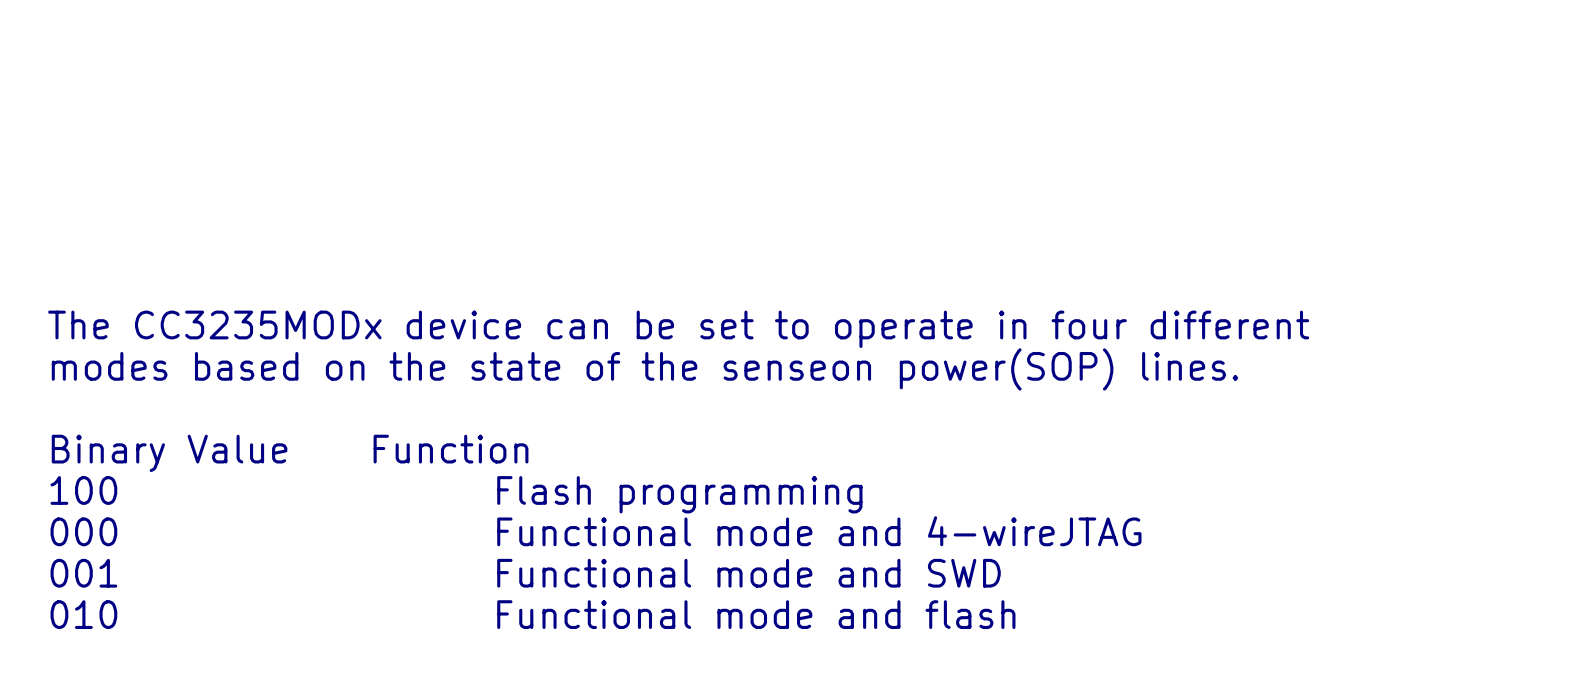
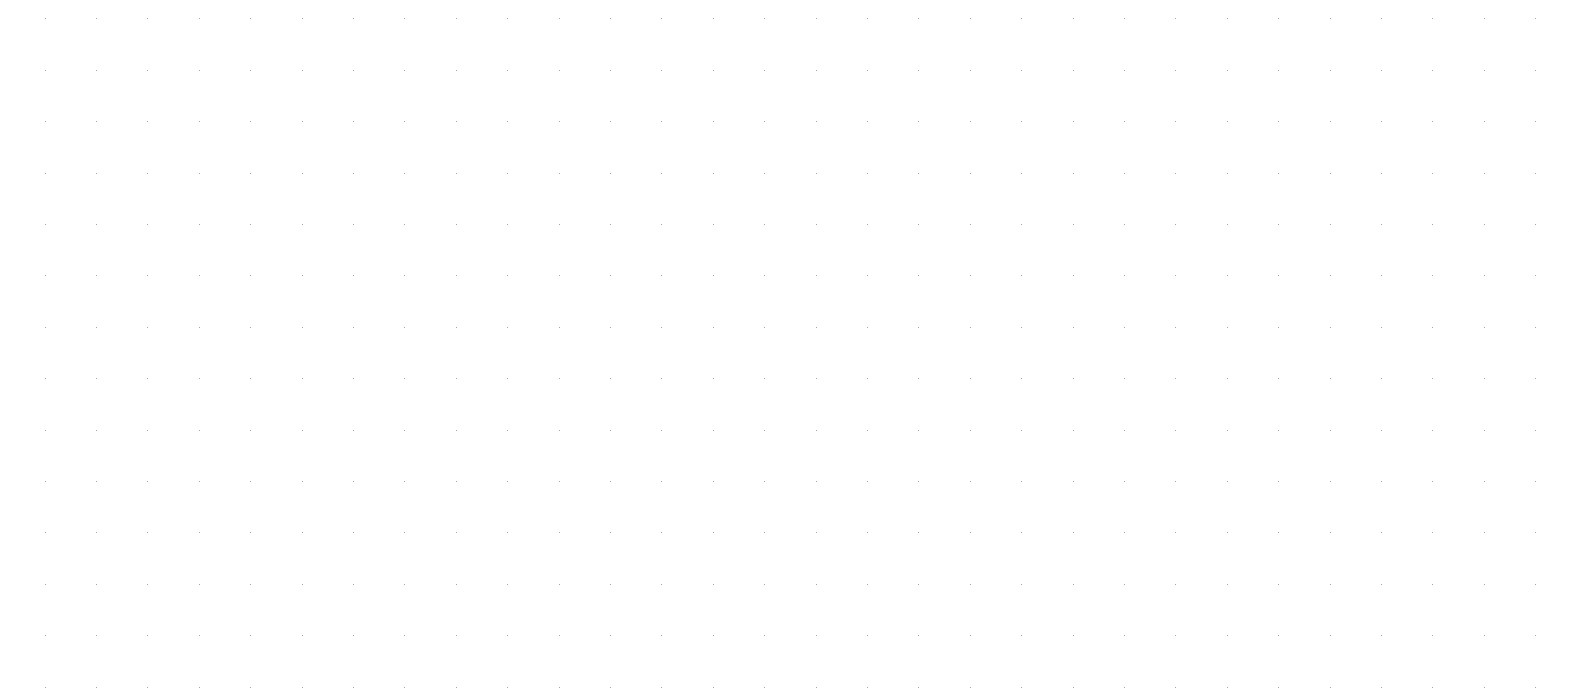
text: The CC3235MODx device can be set to operate in four different (678, 329) -> none
text: modes based on the state of the senseon power(SOP) lines. (644, 369) -> none
text: Binary Value Function (290, 453) -> none
text: 100 Flash programming (456, 494) -> none
text: 000 Functional mode and 4-wireJTAG (596, 531) -> none
text: 001 Functional mode and SWD (525, 573) -> none
text: 010 Functional mode and flash (533, 614) -> none

